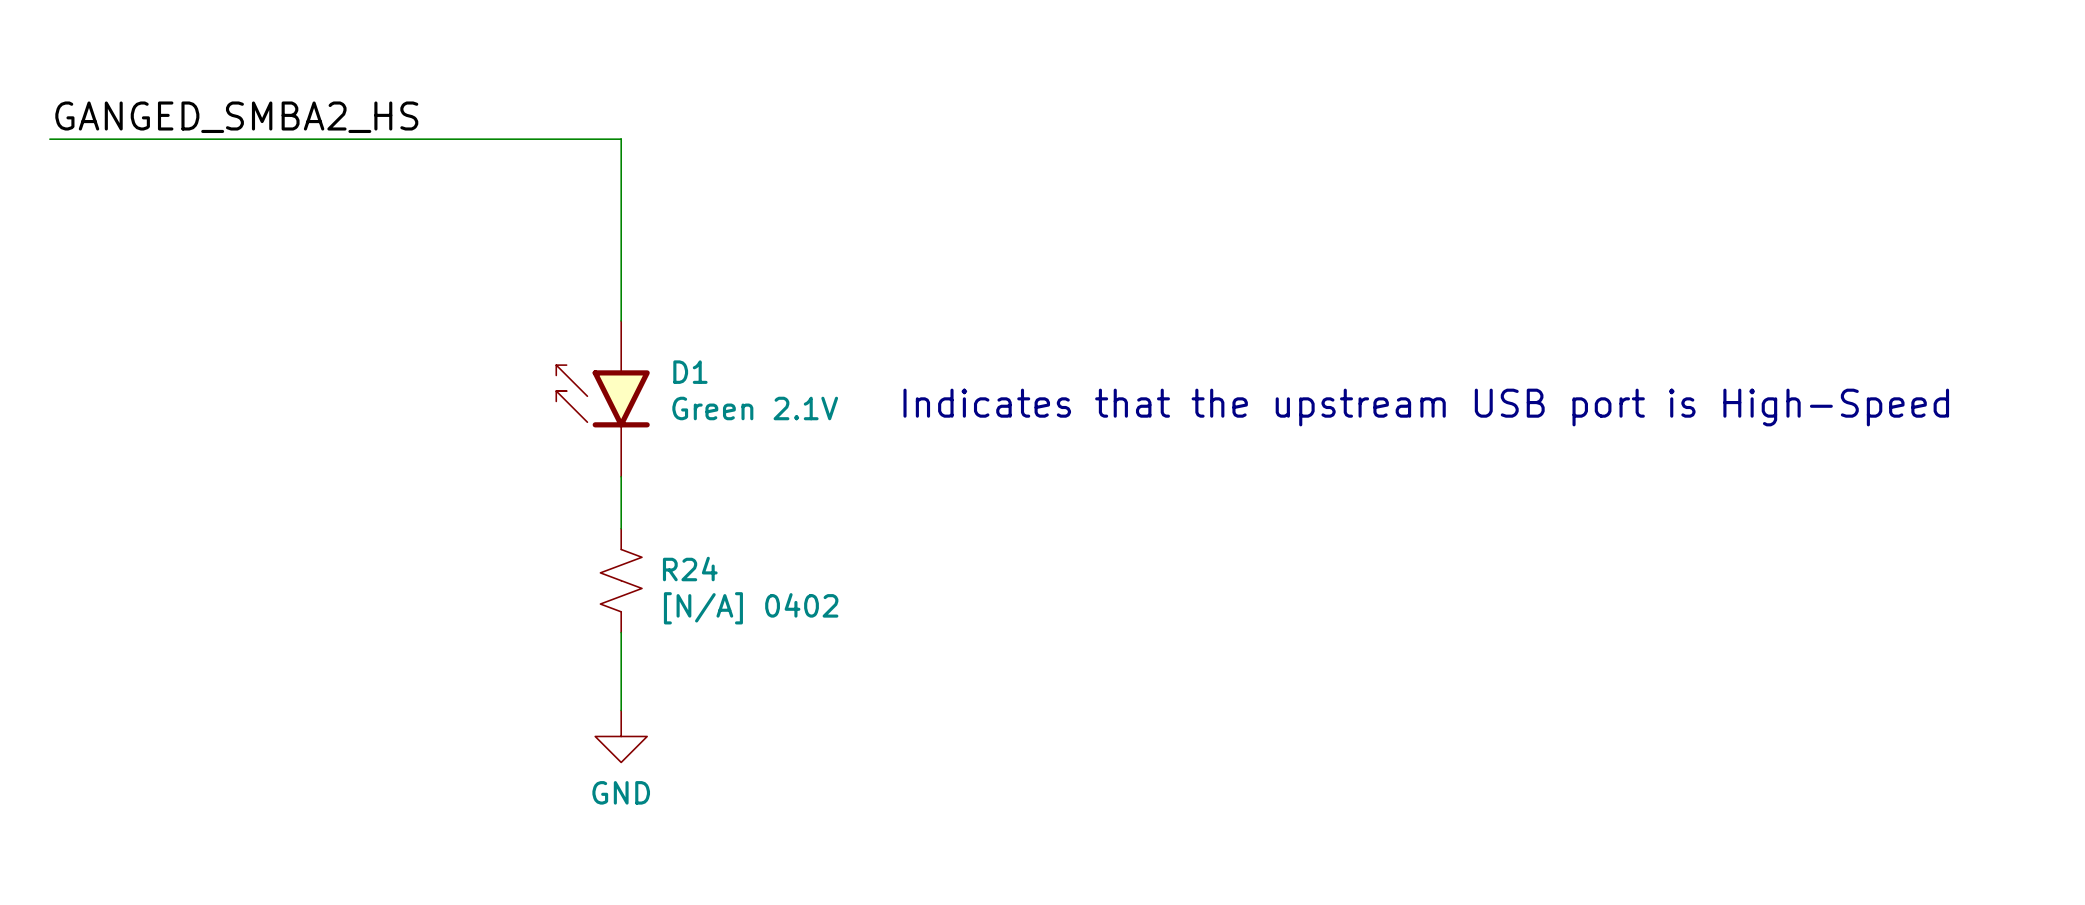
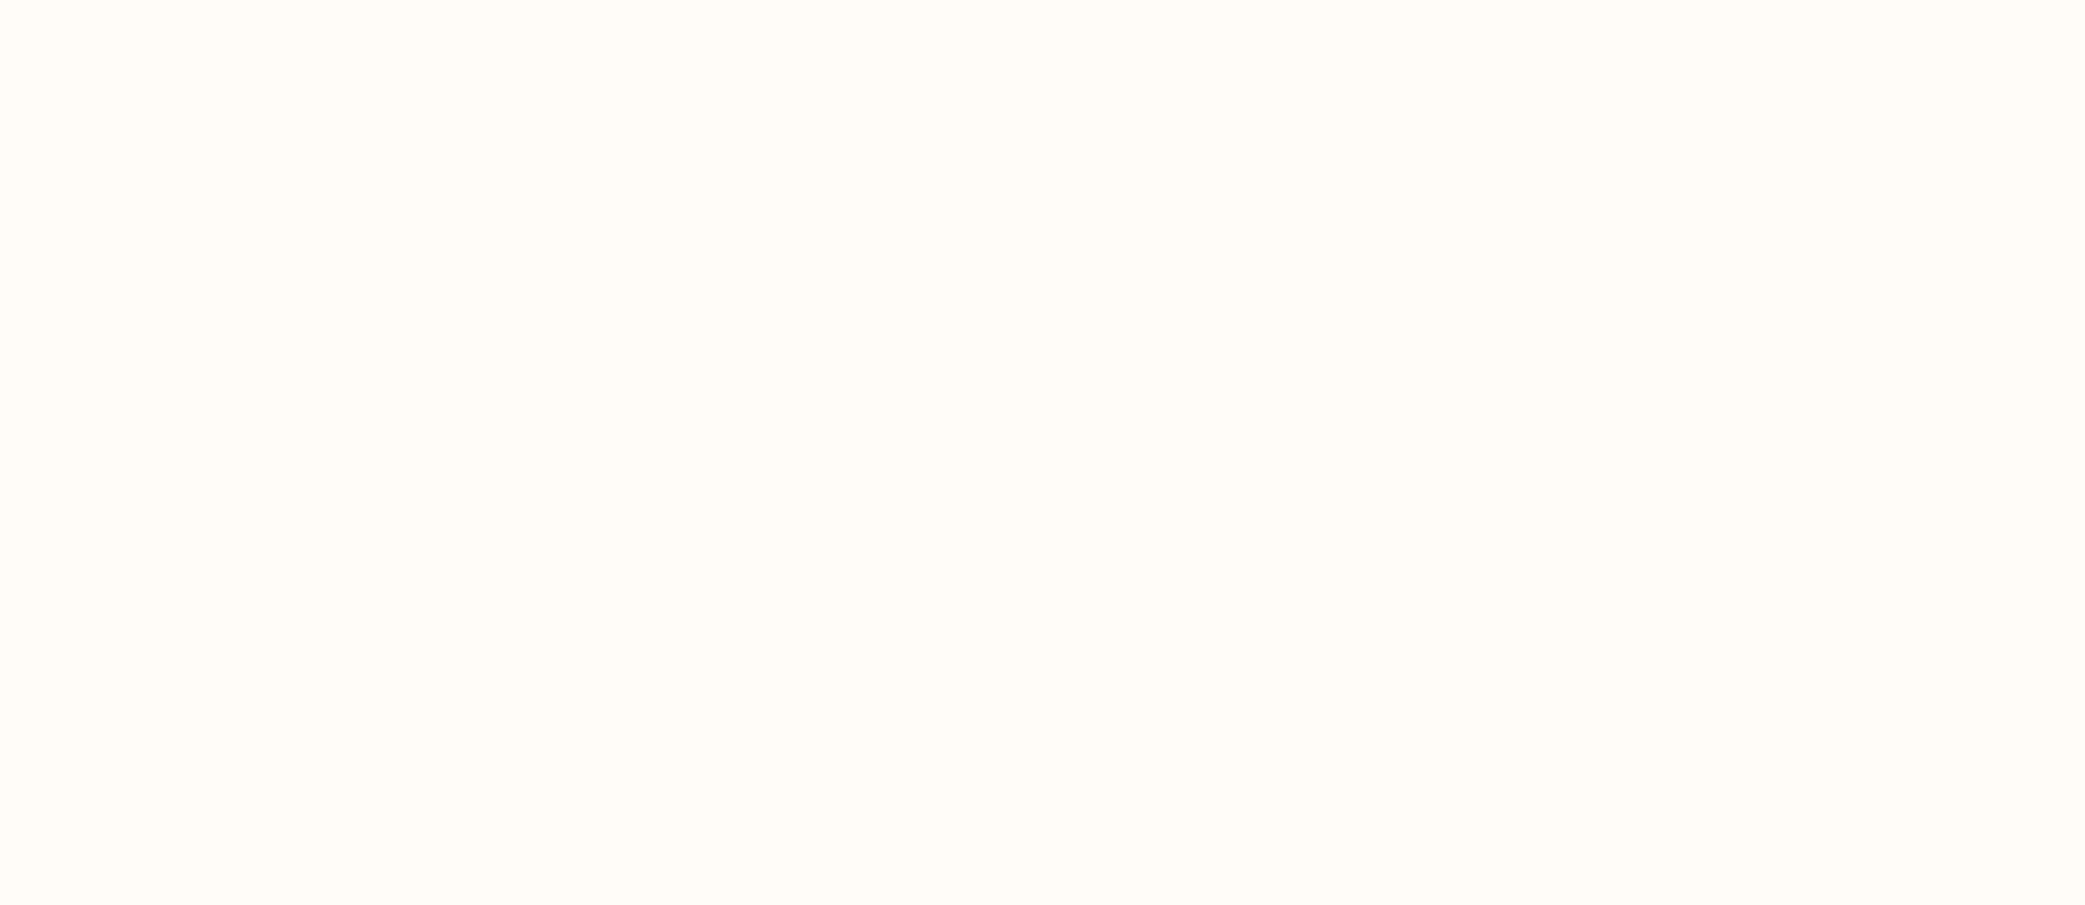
label: GANGED_SMBA2_HS (236, 117) -> none
wire: (49, 139) (621, 139) (621, 320) -> none
D1: Green 2.1V (603, 398) -> none
text: Indicates that the upstream USB port is High-Speed (1426, 407) -> none
wire: (621, 476) (621, 528) -> none
R24: [N/A] 0402 (621, 580) -> none
wire: (621, 632) (621, 710) -> none
power symbol: GND (621, 736) -> none

